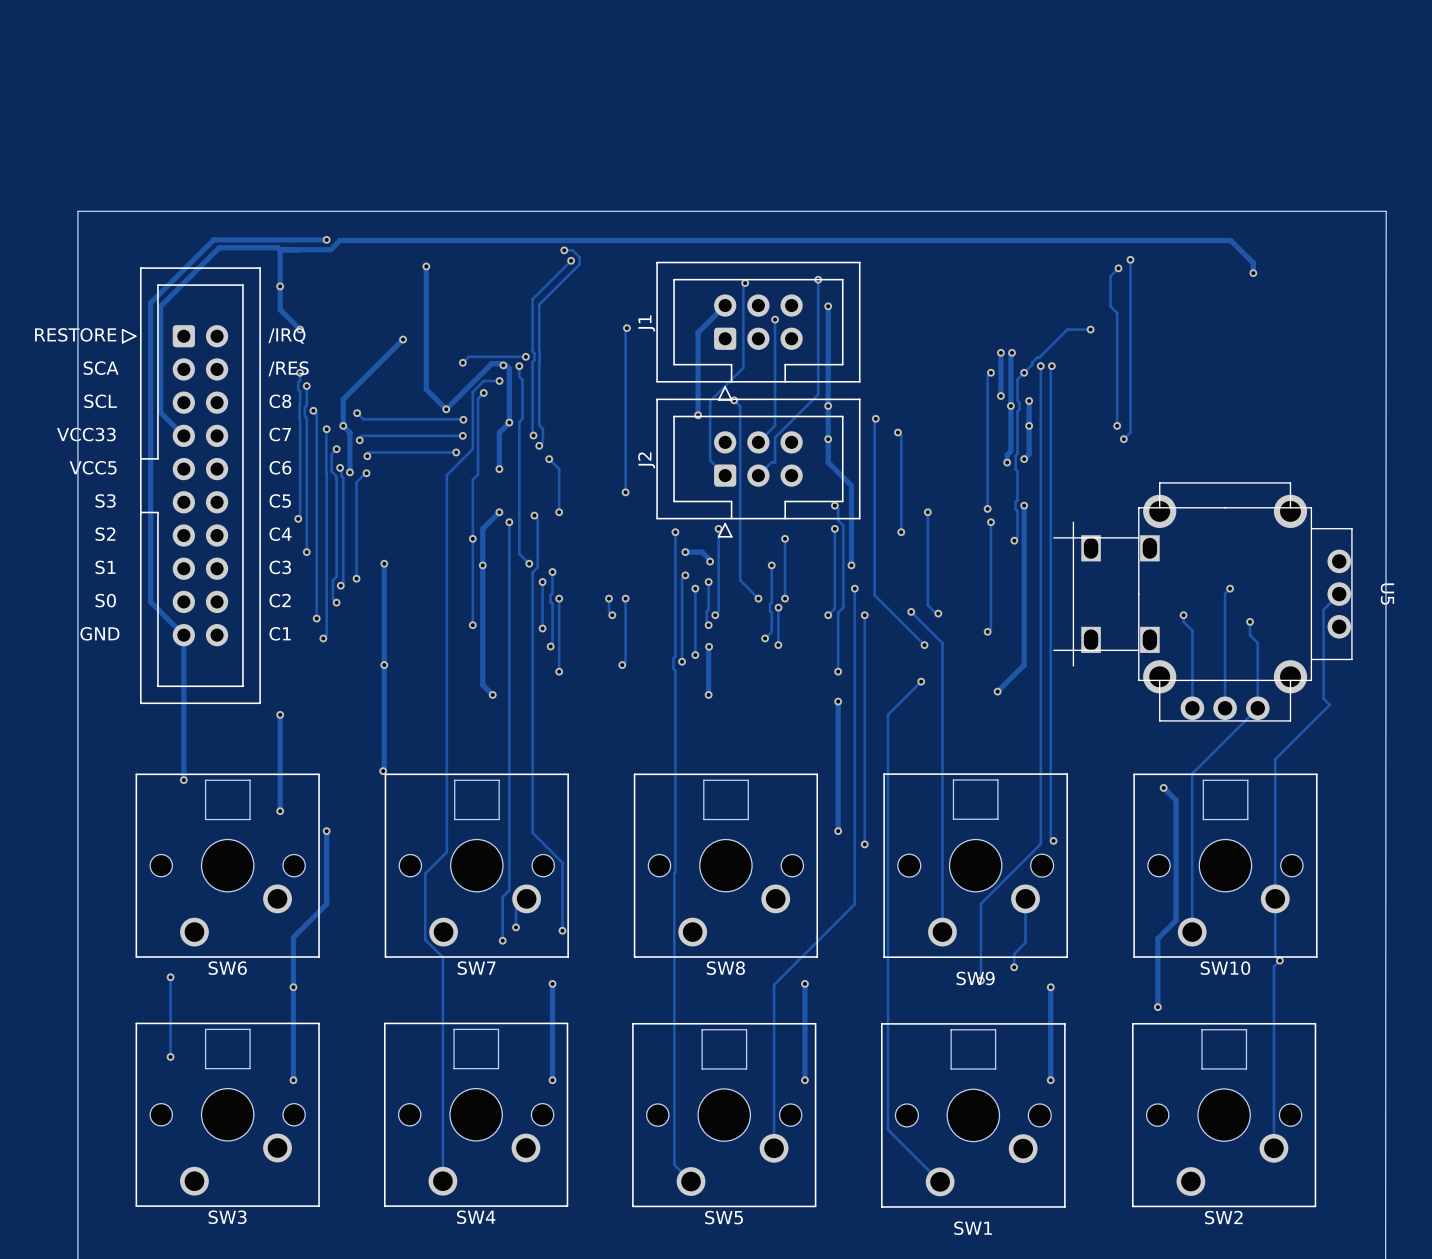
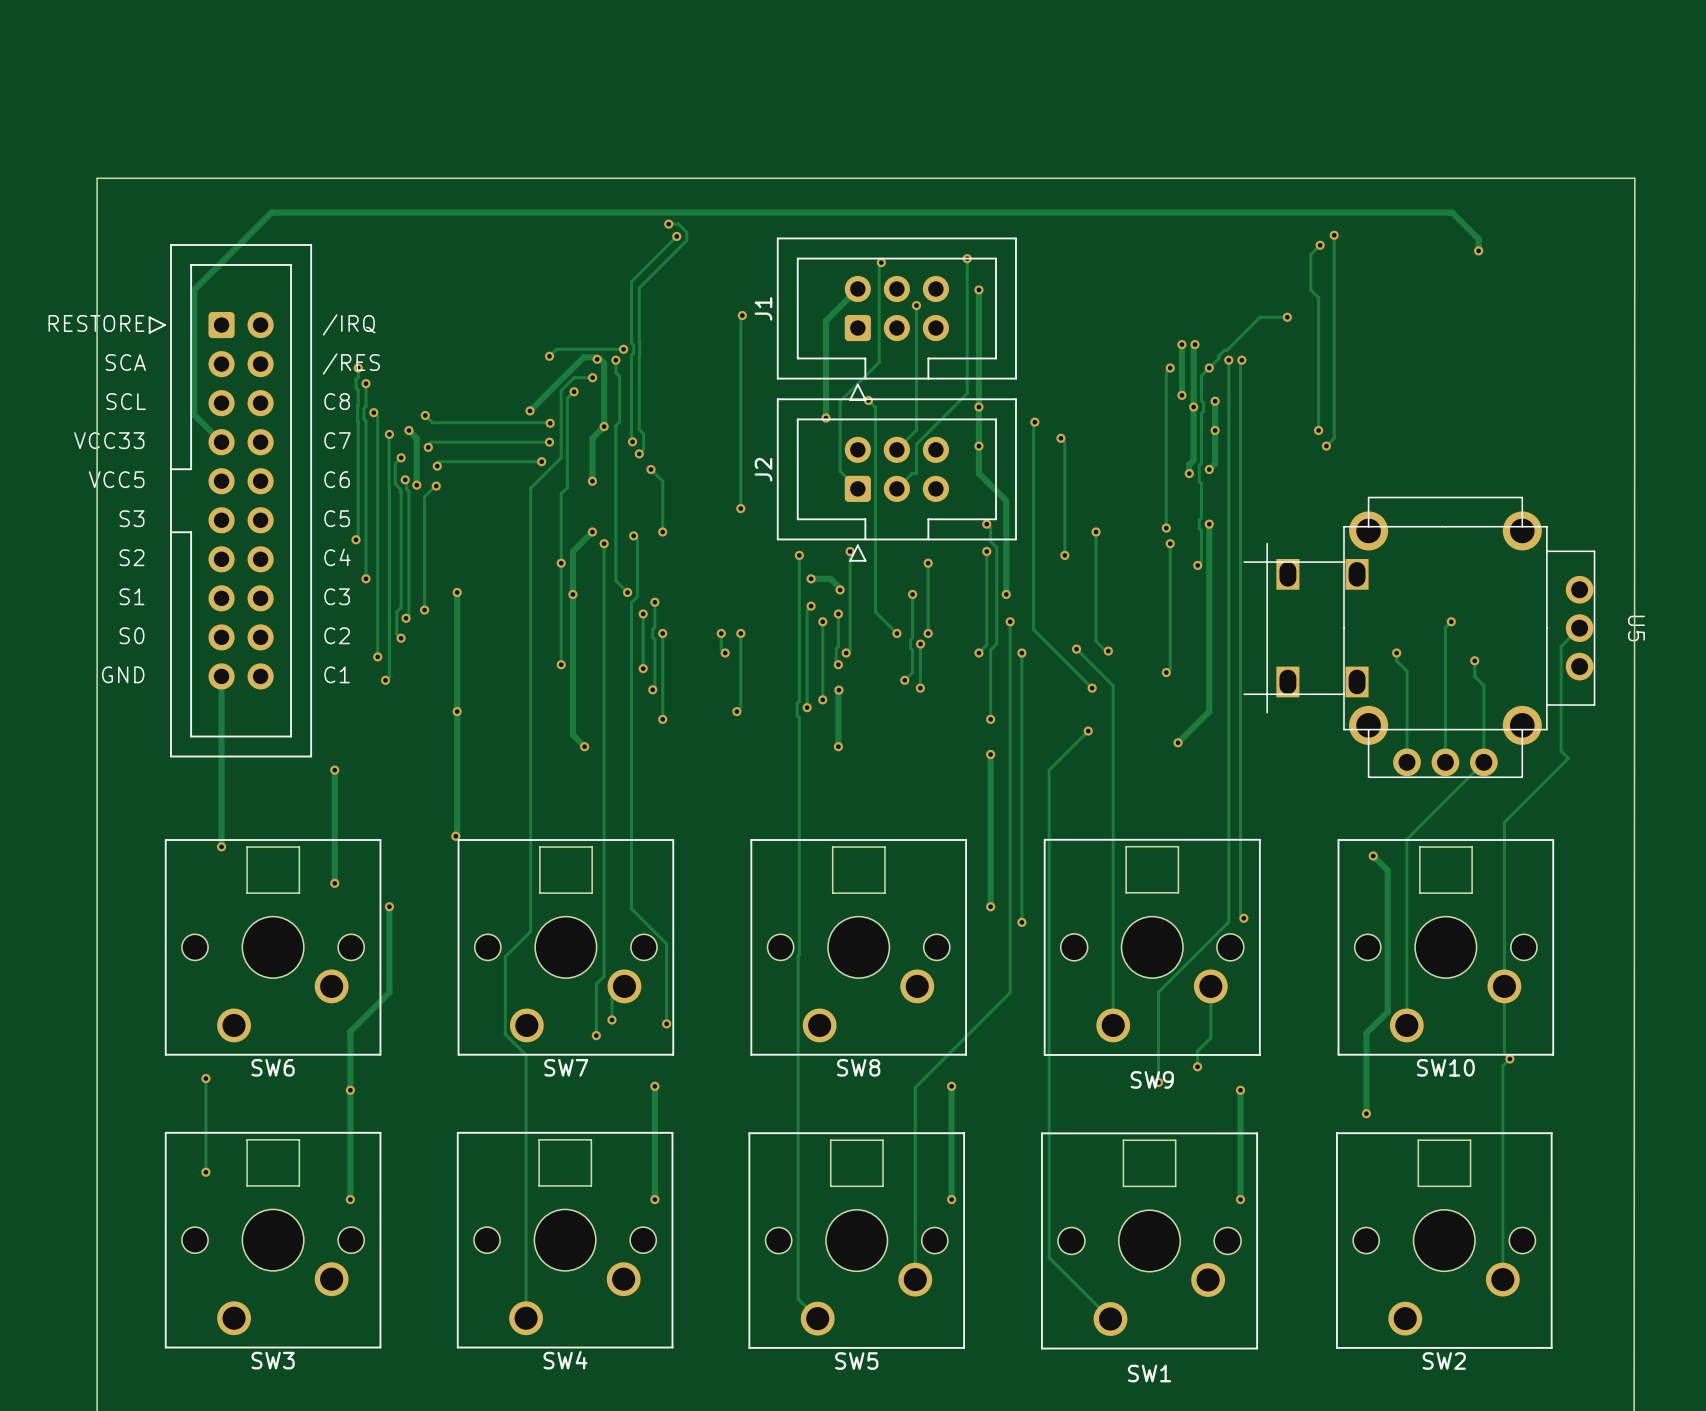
track: (326, 239) (213, 239) (150, 303) (150, 601) (183, 635) -> none
via: (326, 239) -> none
track: (339, 240) (330, 249) (280, 249) -> none
track: (219, 247) (278, 247) (280, 249) -> (263, 221) (271, 212) (404, 212)
track: (280, 249) (280, 309) (300, 329) -> none
track: (426, 266) (426, 389) (446, 409) -> none
via: (426, 266) -> none
via: (280, 286) -> none
via: (300, 329) -> none
track: (403, 339) (343, 399) (343, 425) -> none
via: (403, 339) -> none

